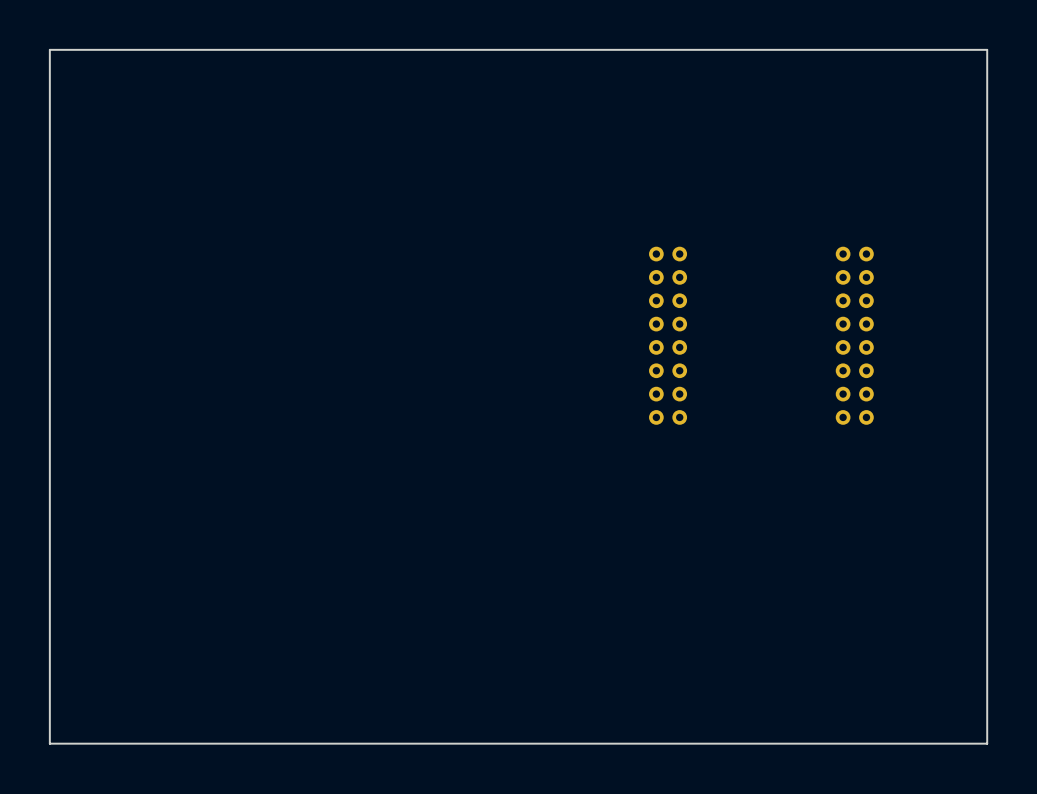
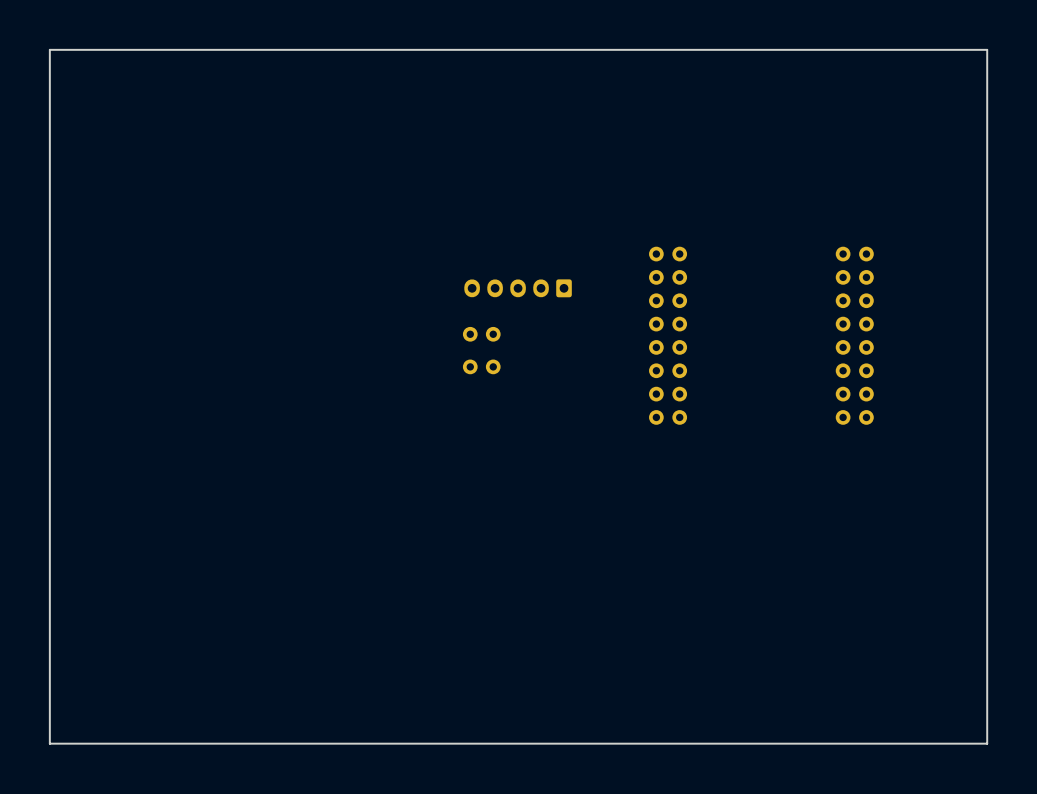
part: none -> (518, 288)
part: none -> (481, 334)
part: none -> (481, 366)

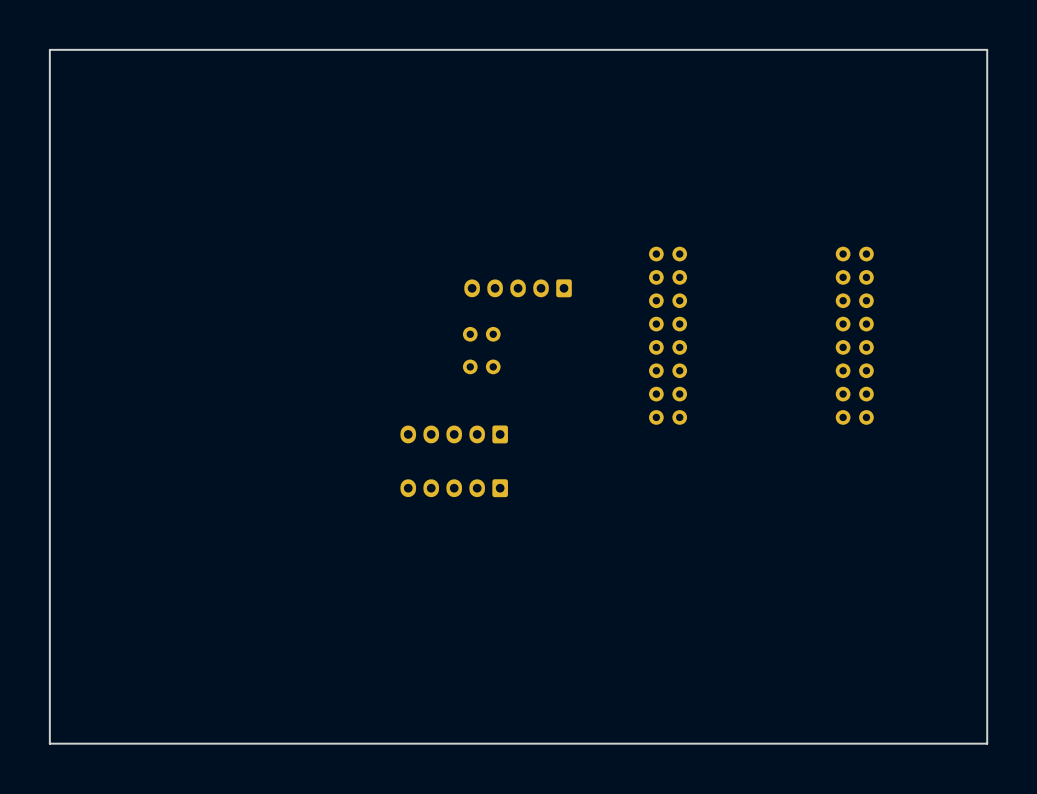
part: none -> (454, 434)
part: none -> (454, 488)

